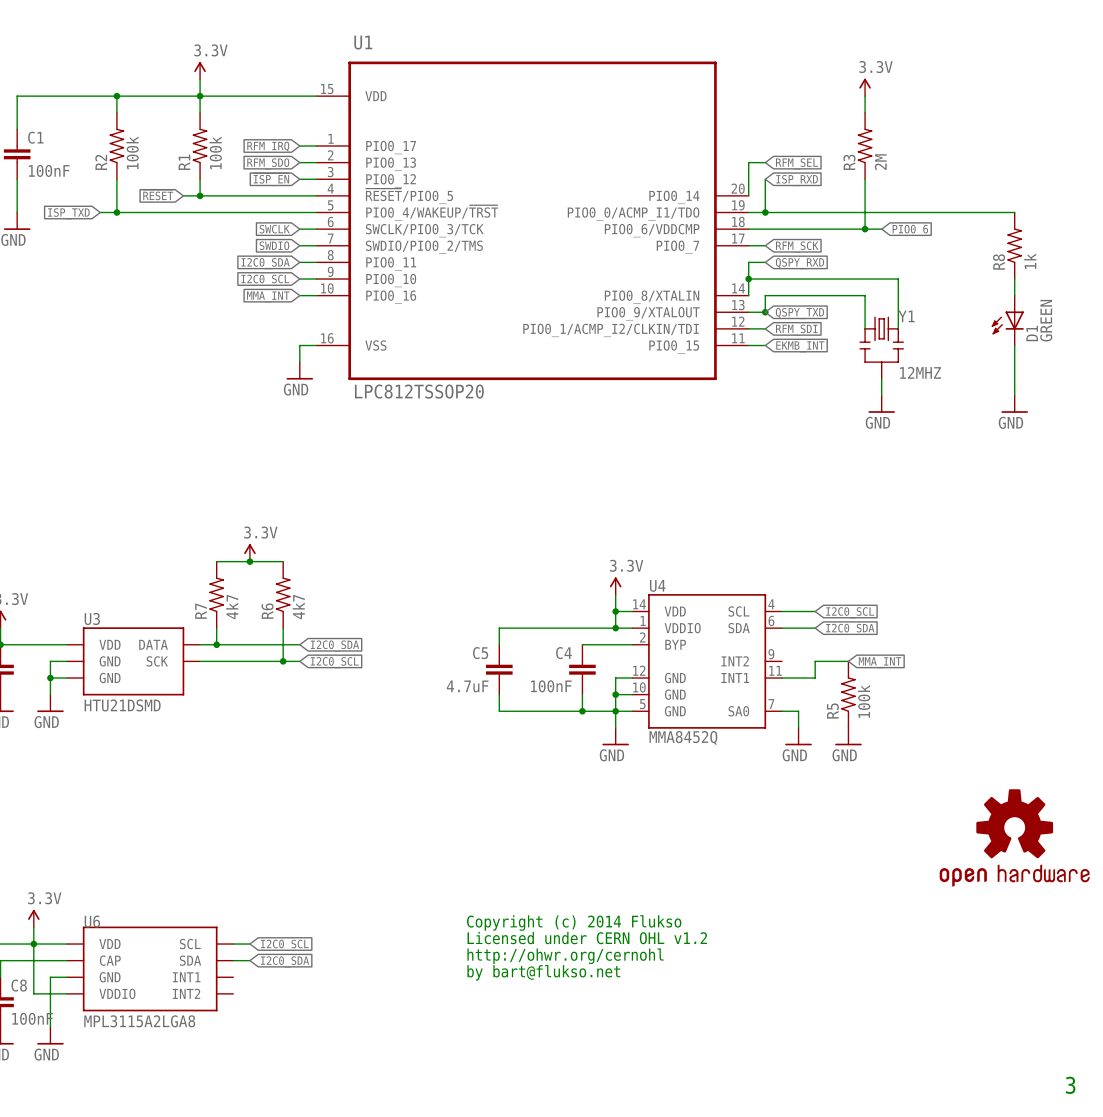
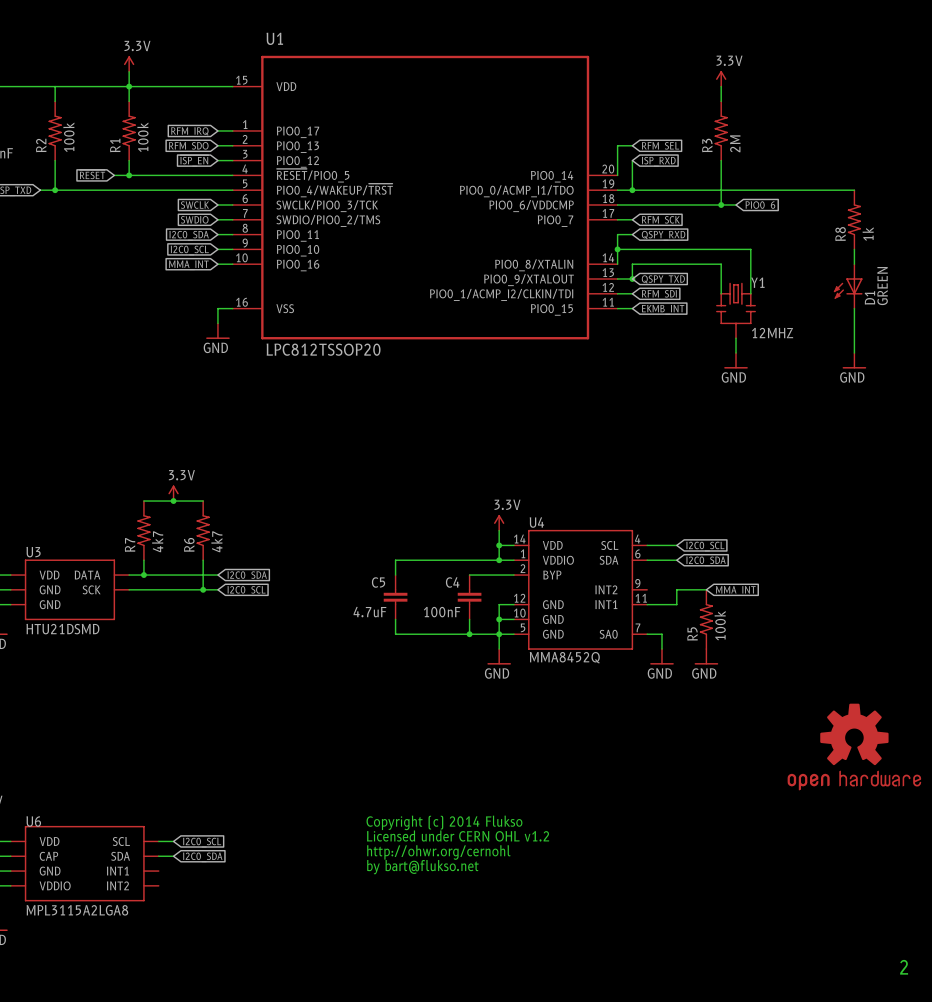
junction: (116, 96) -> none
text: 3 (1070, 1085) -> 2 (904, 967)

